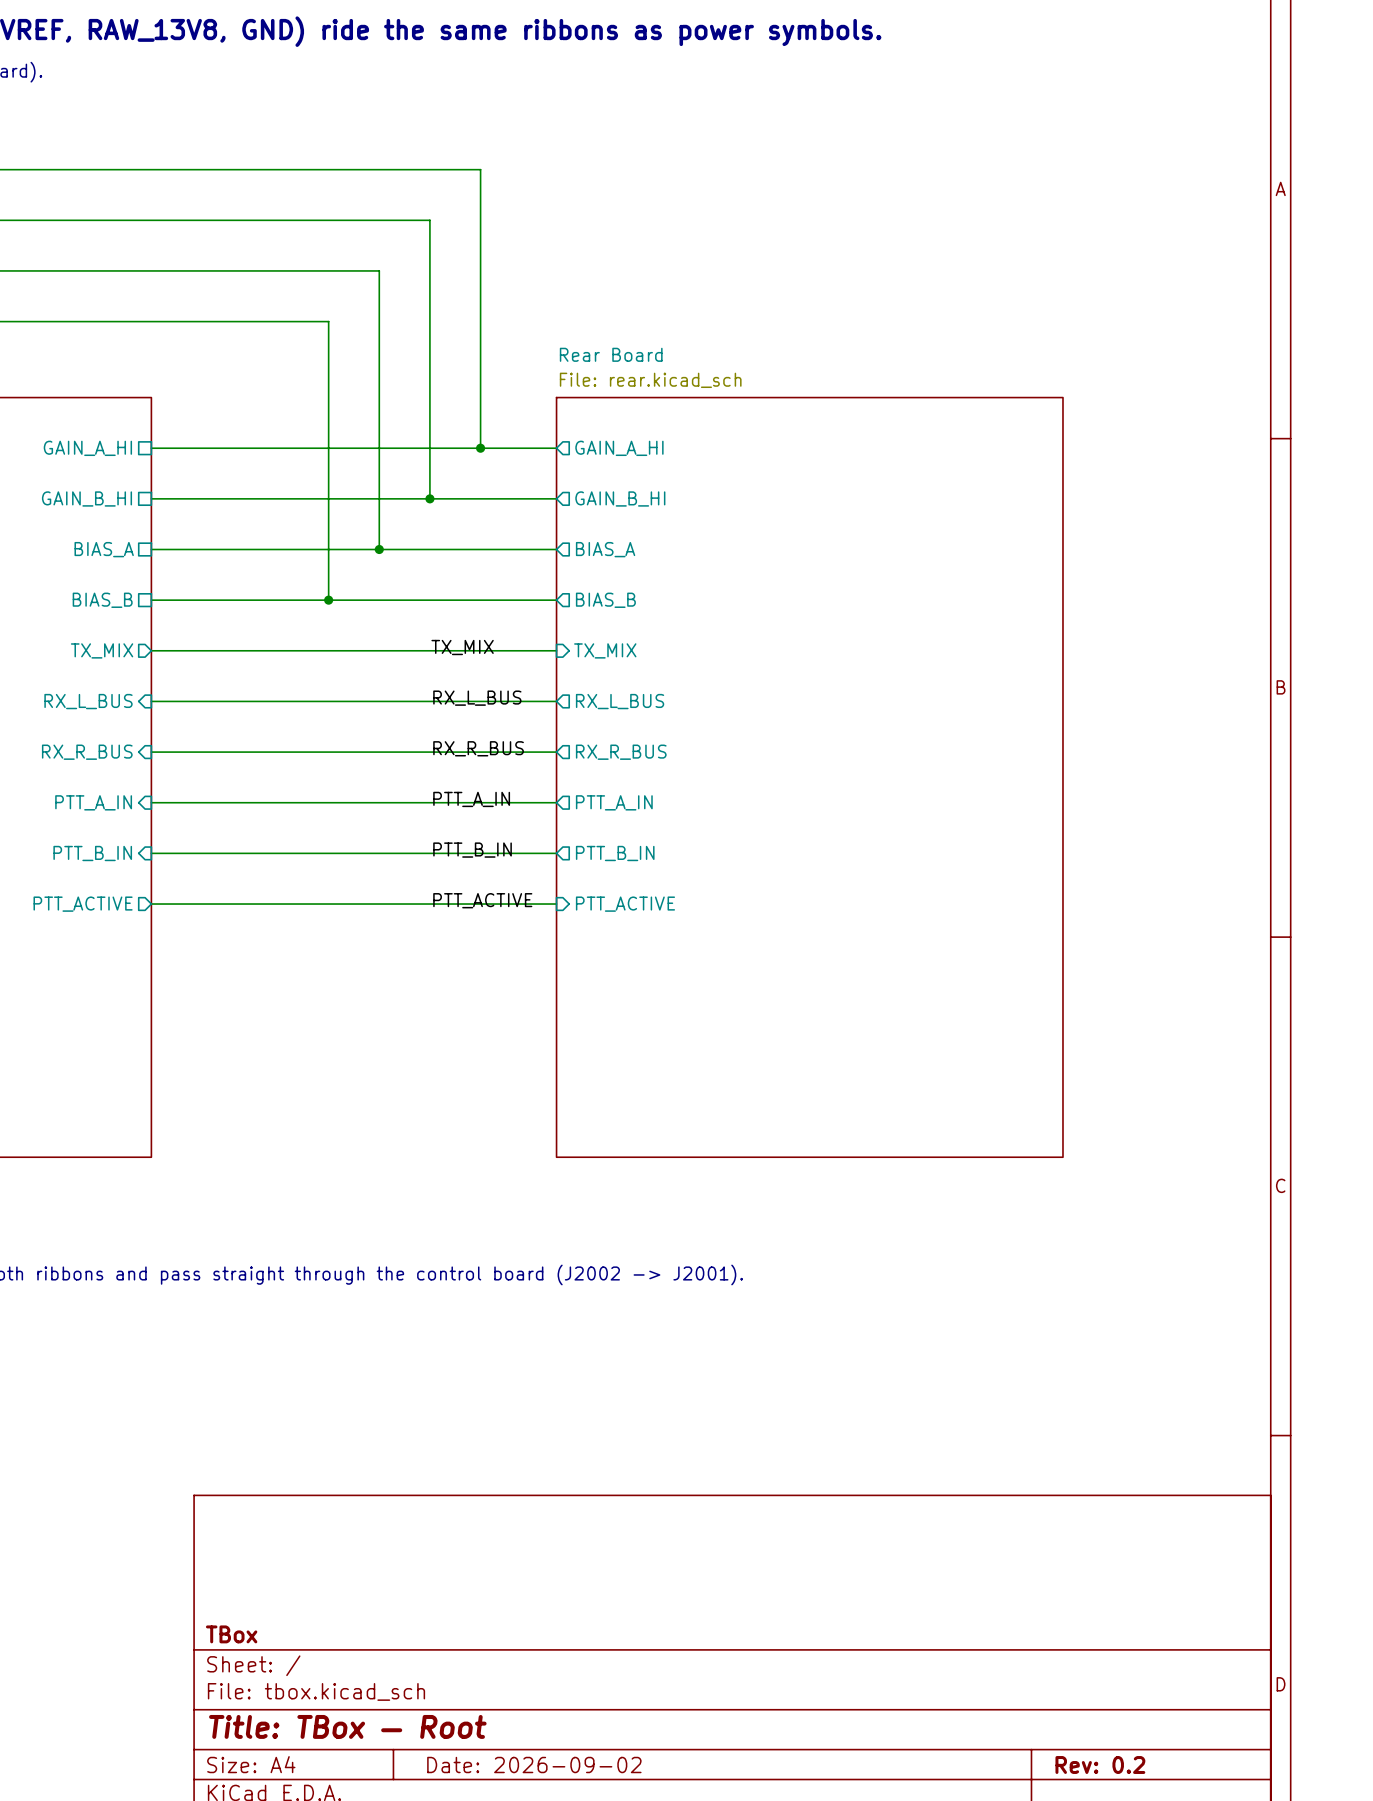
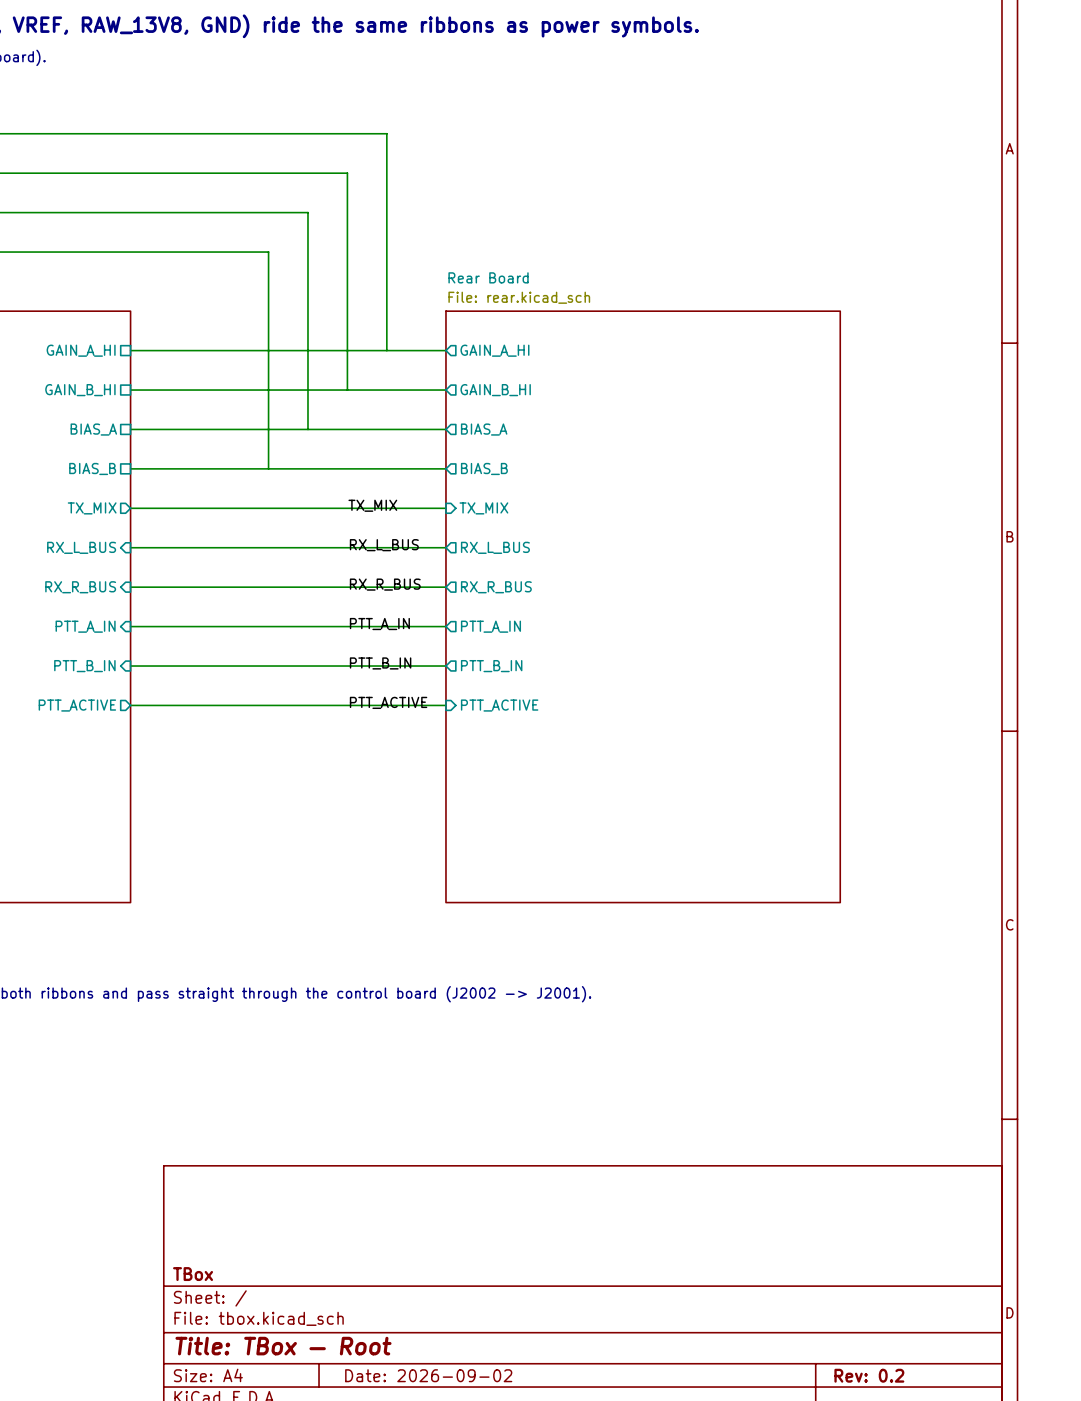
junction: (480, 448) -> none
junction: (429, 498) -> none
junction: (379, 549) -> none
junction: (328, 600) -> none

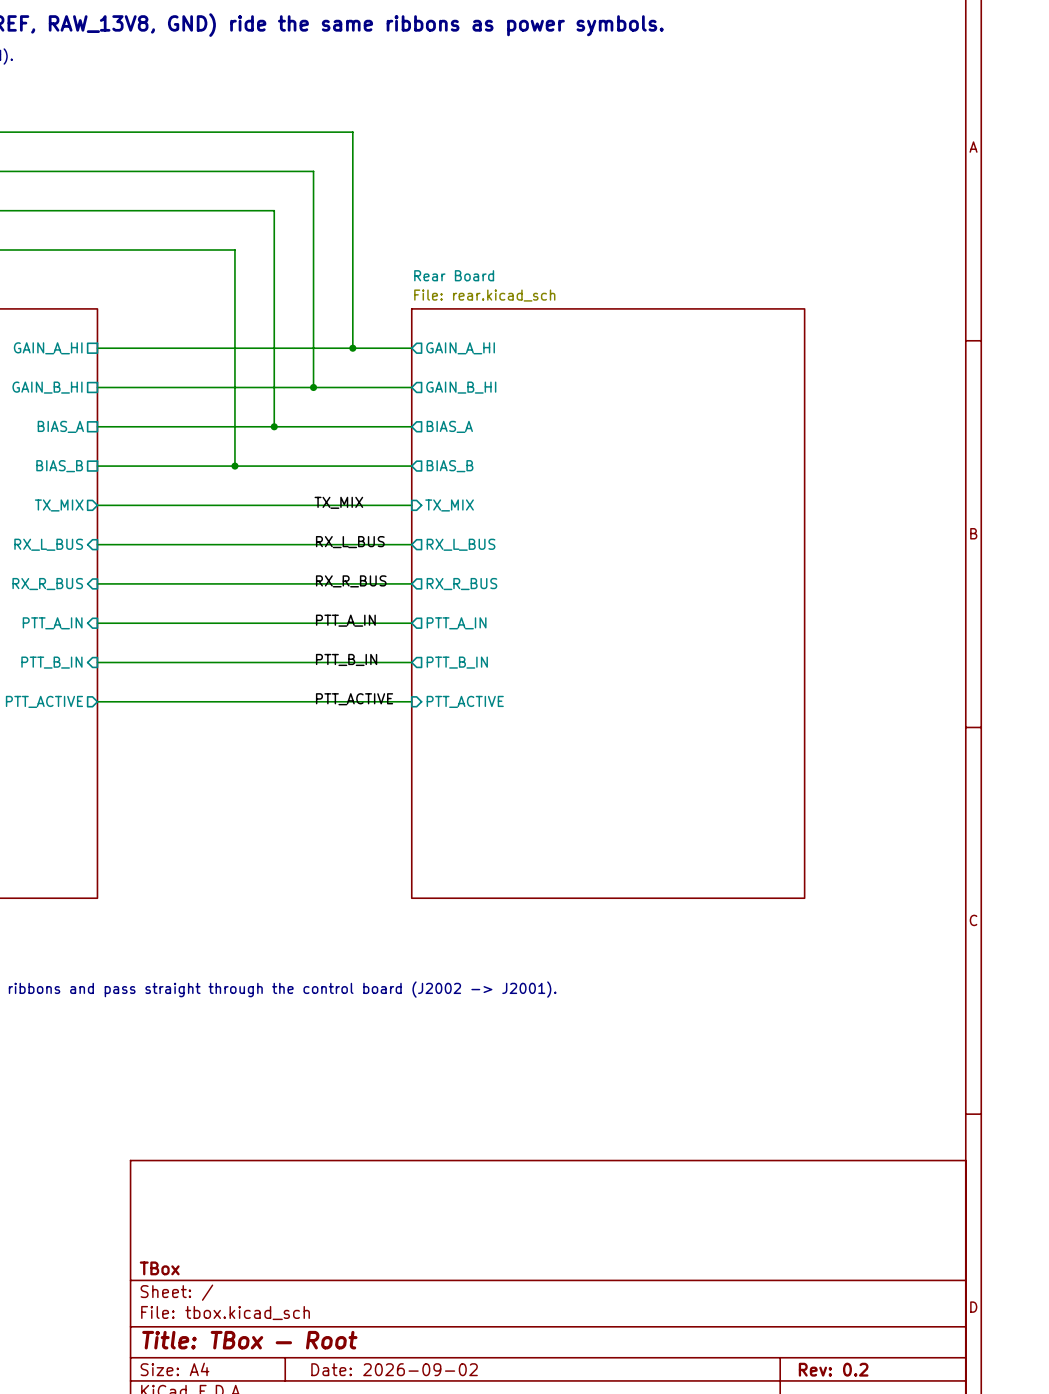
junction: none -> (352, 348)
junction: none -> (313, 387)
junction: none -> (274, 426)
junction: none -> (234, 466)

